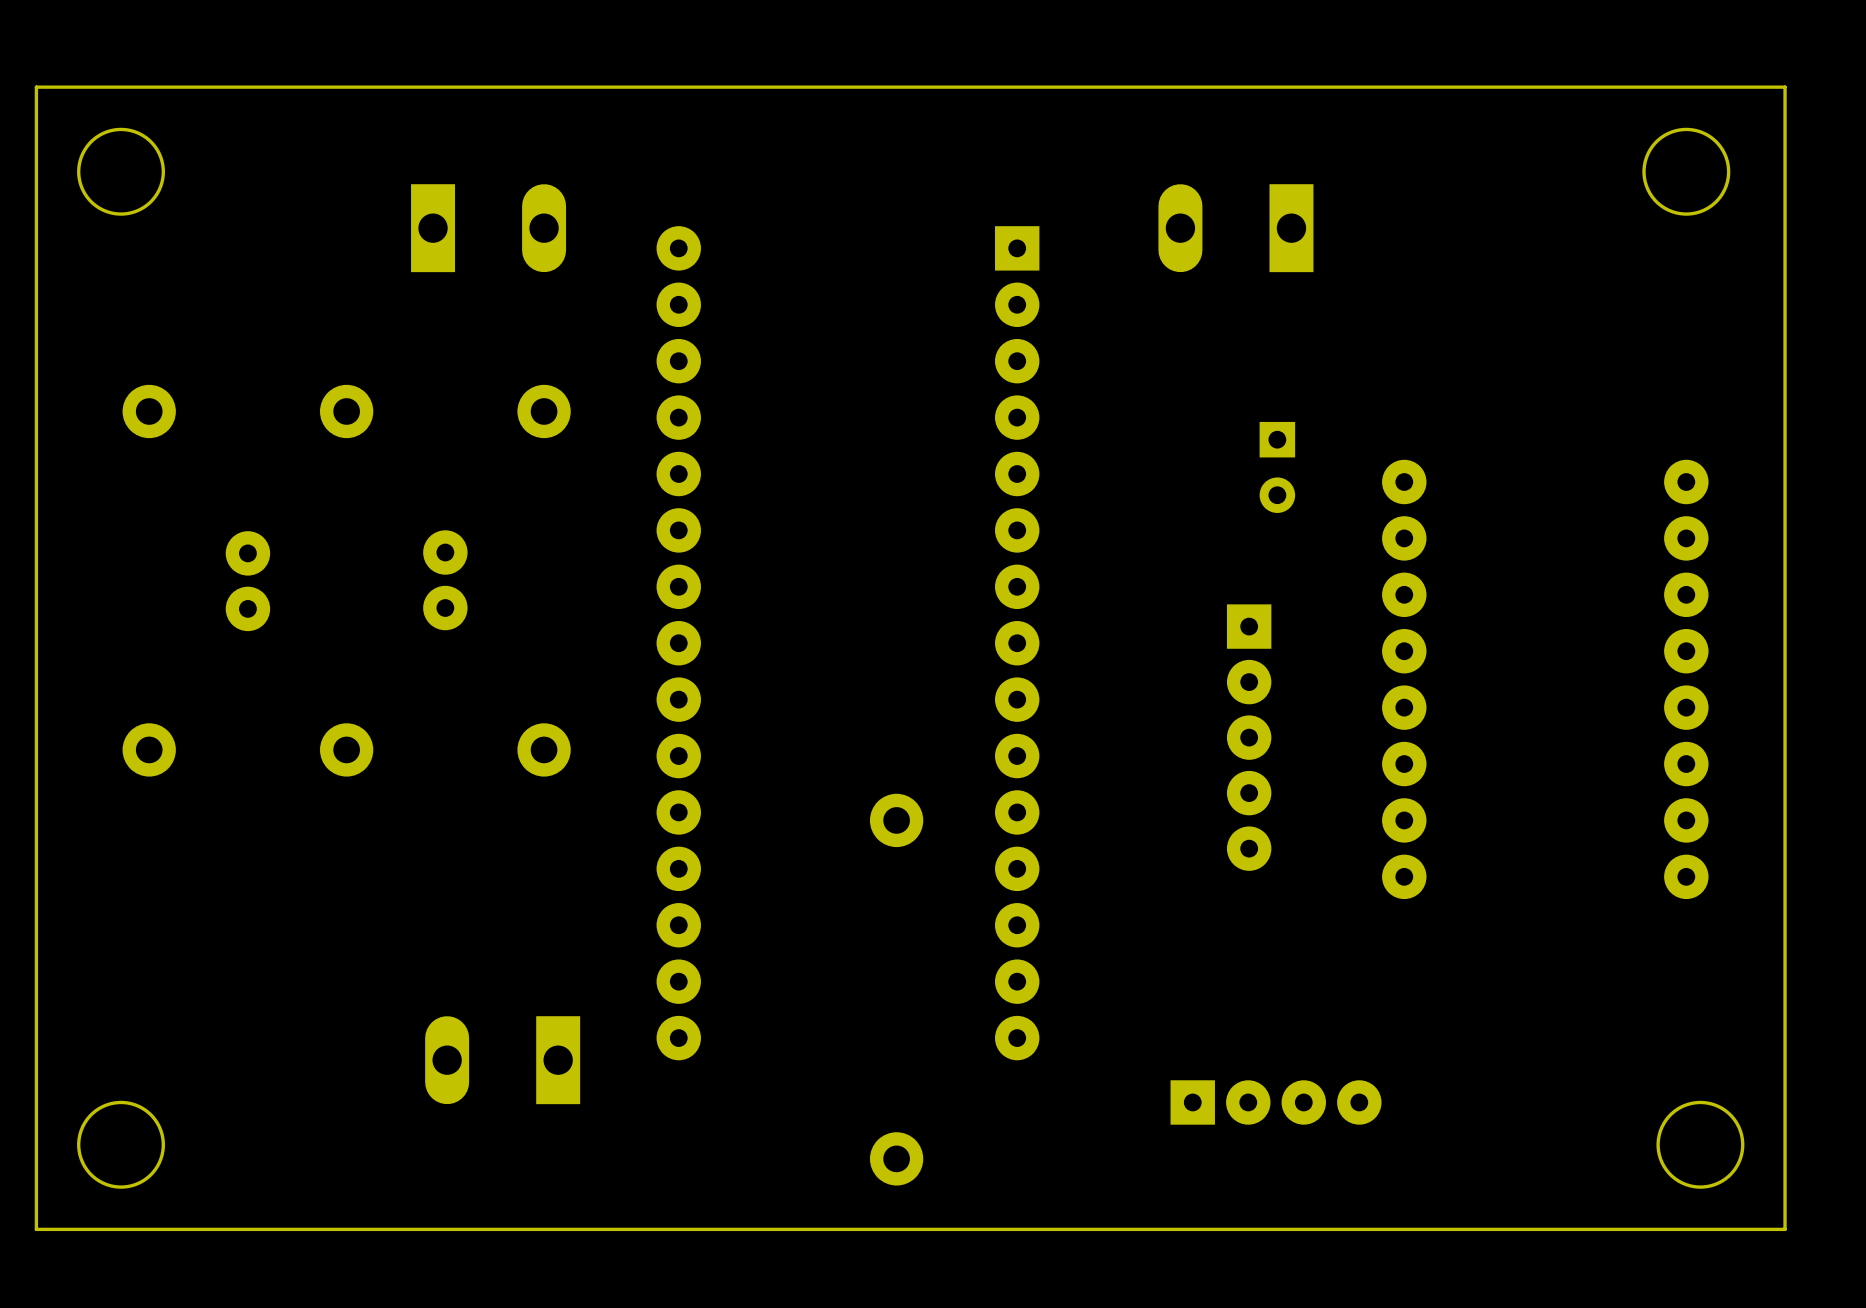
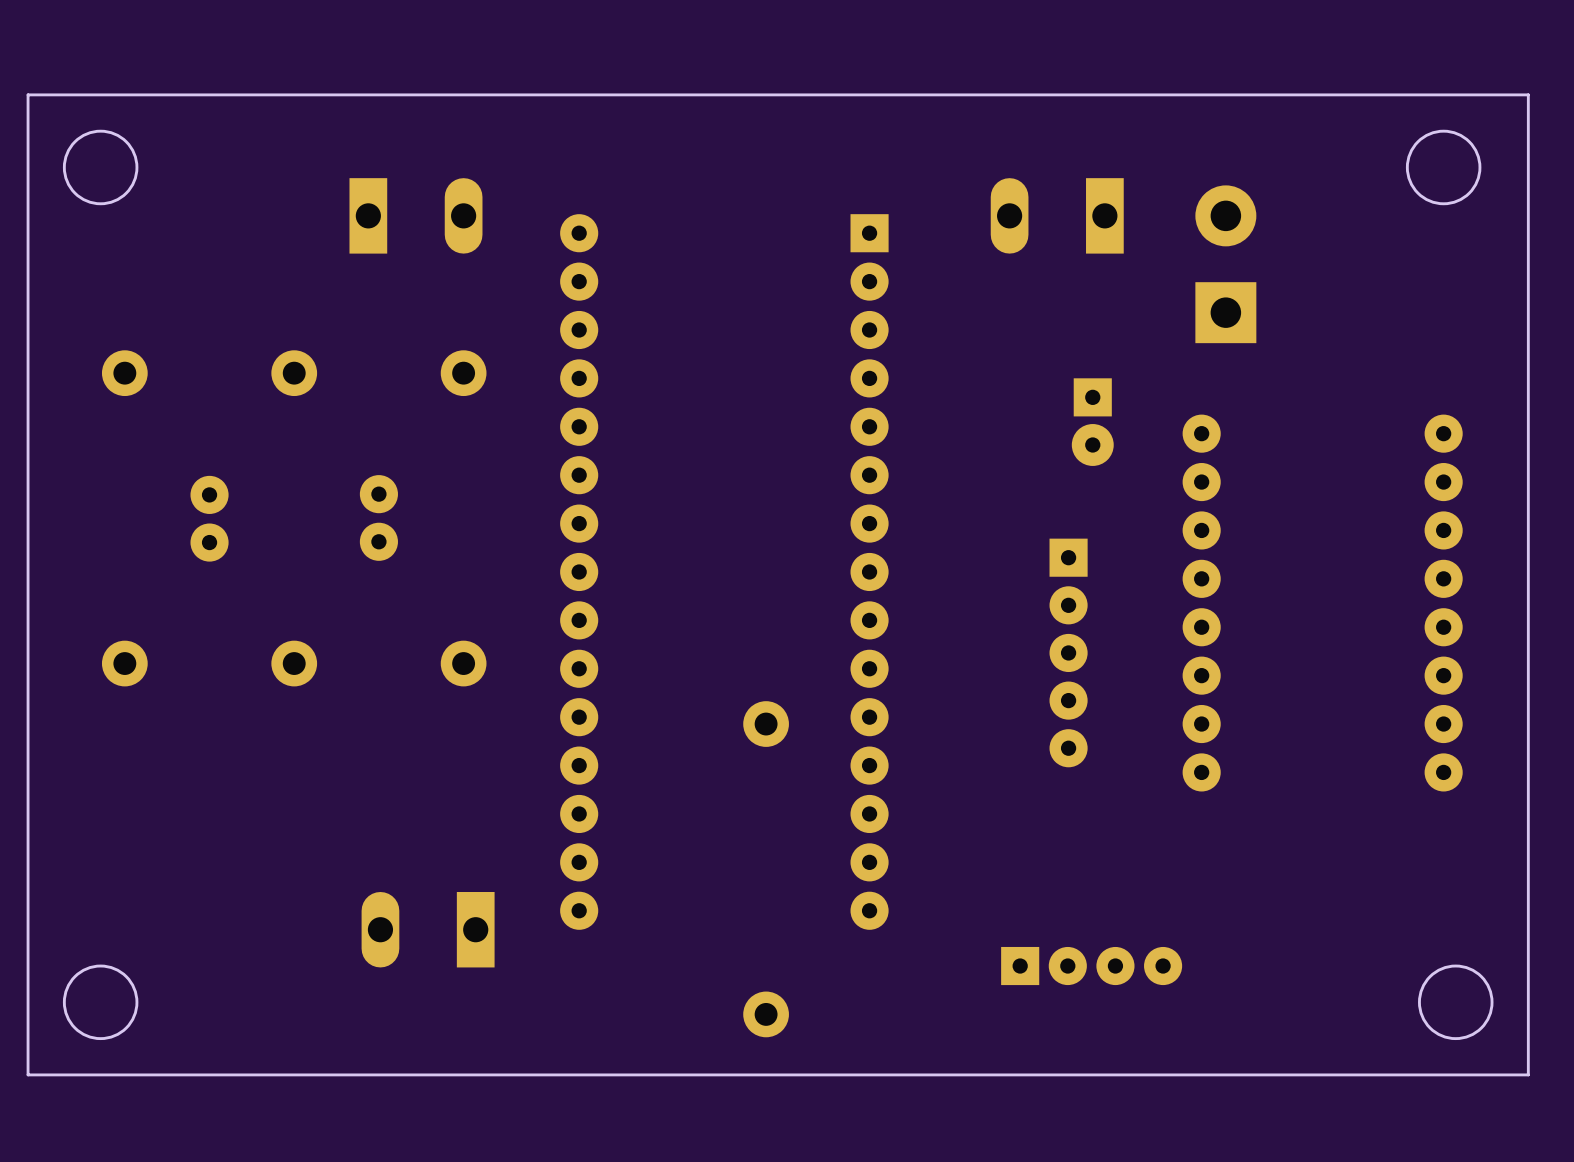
part: none -> (1225, 264)
part footprint: [1259, 421, 1296, 513] -> [1071, 378, 1114, 466]

